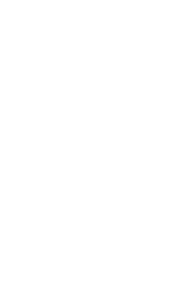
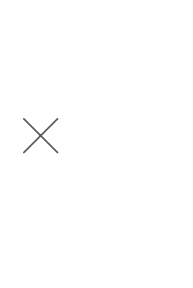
no-connect mark: none -> (40, 135)

